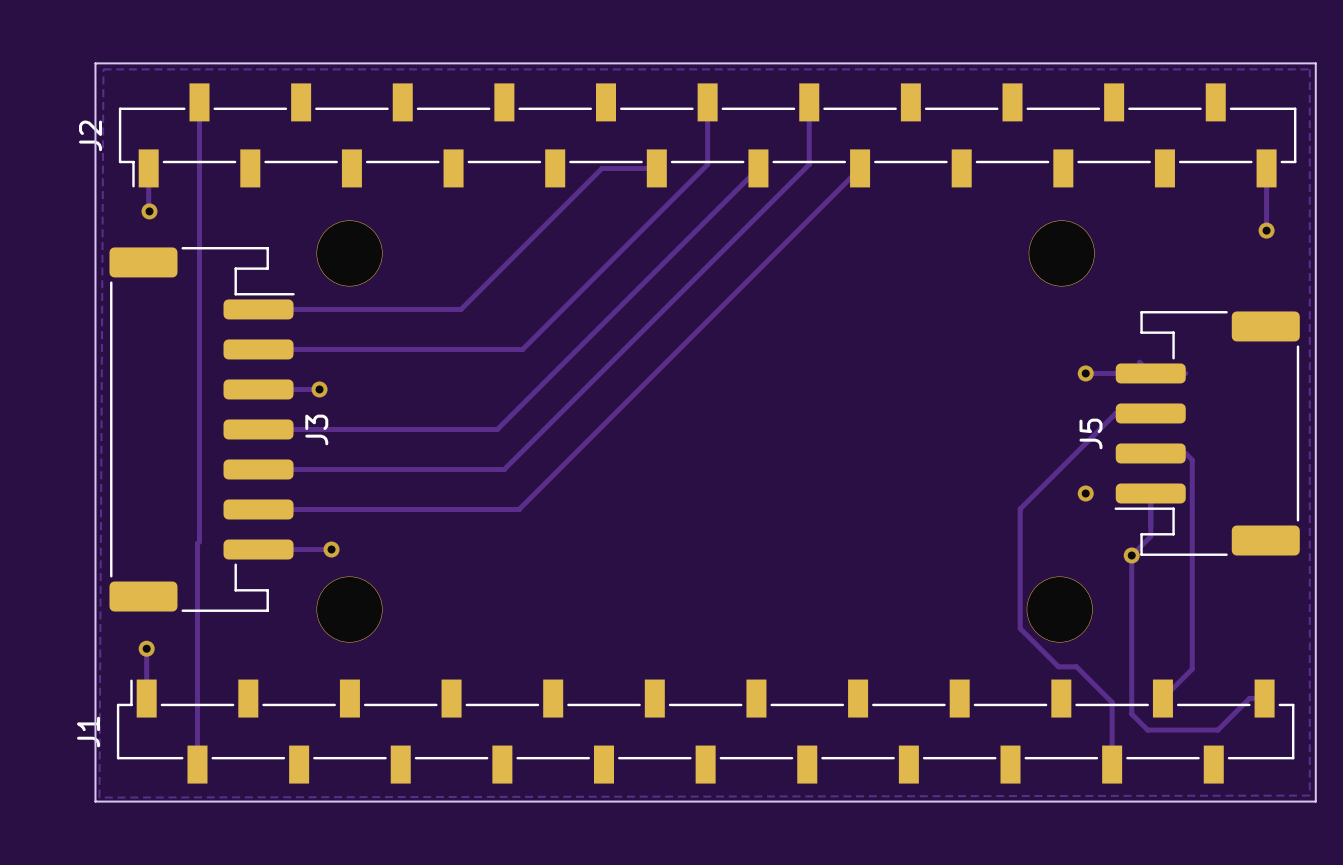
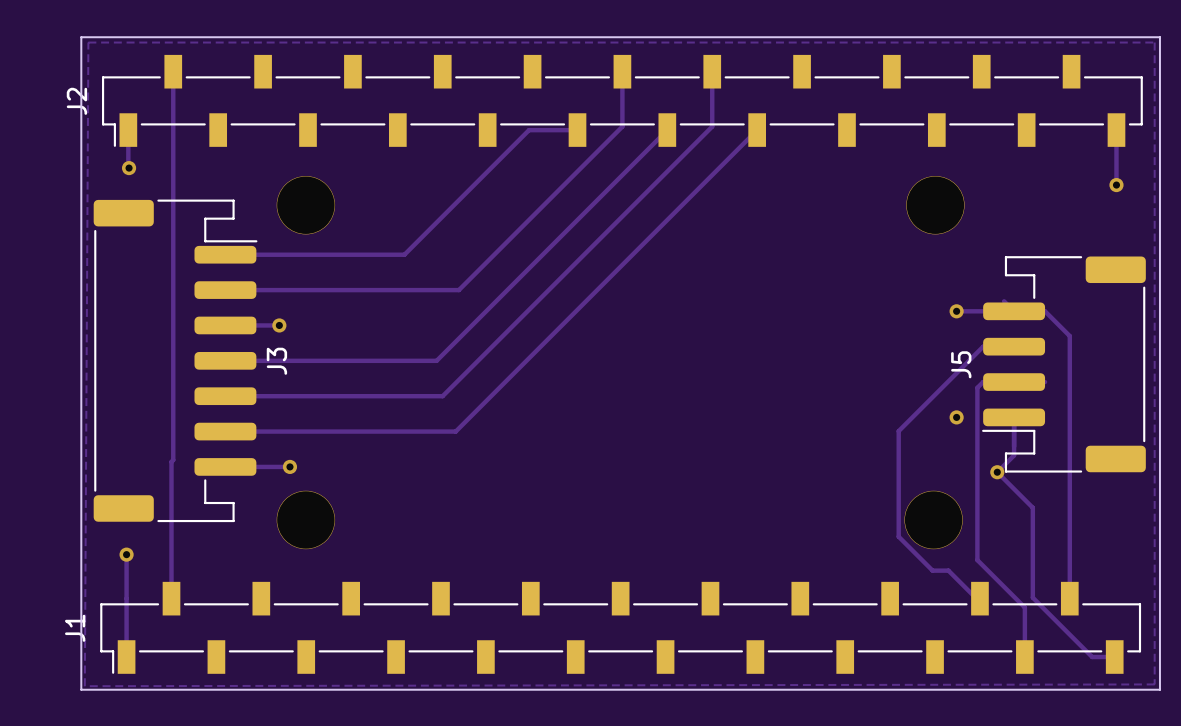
track: none -> (1045, 311) (1069, 336) (1069, 598)
track: none -> (1014, 382) (983, 382) (977, 387) (977, 560) (1024, 607) (1024, 657)
track: (1185, 453) (1192, 459) (1192, 669) (1162, 698) -> none
track: (1131, 555) (1131, 714) (1147, 730) (1217, 730) (1249, 698) (1264, 698) -> (997, 472) (1032, 507) (1032, 597) (1092, 657) (1114, 657)
J1 footprint: [116, 679, 1295, 784] -> [100, 581, 1142, 674]
track: none -> (126, 598) (126, 657)
track: (197, 698) (197, 764) (199, 762) -> none
track: (1112, 702) (1112, 764) -> none

